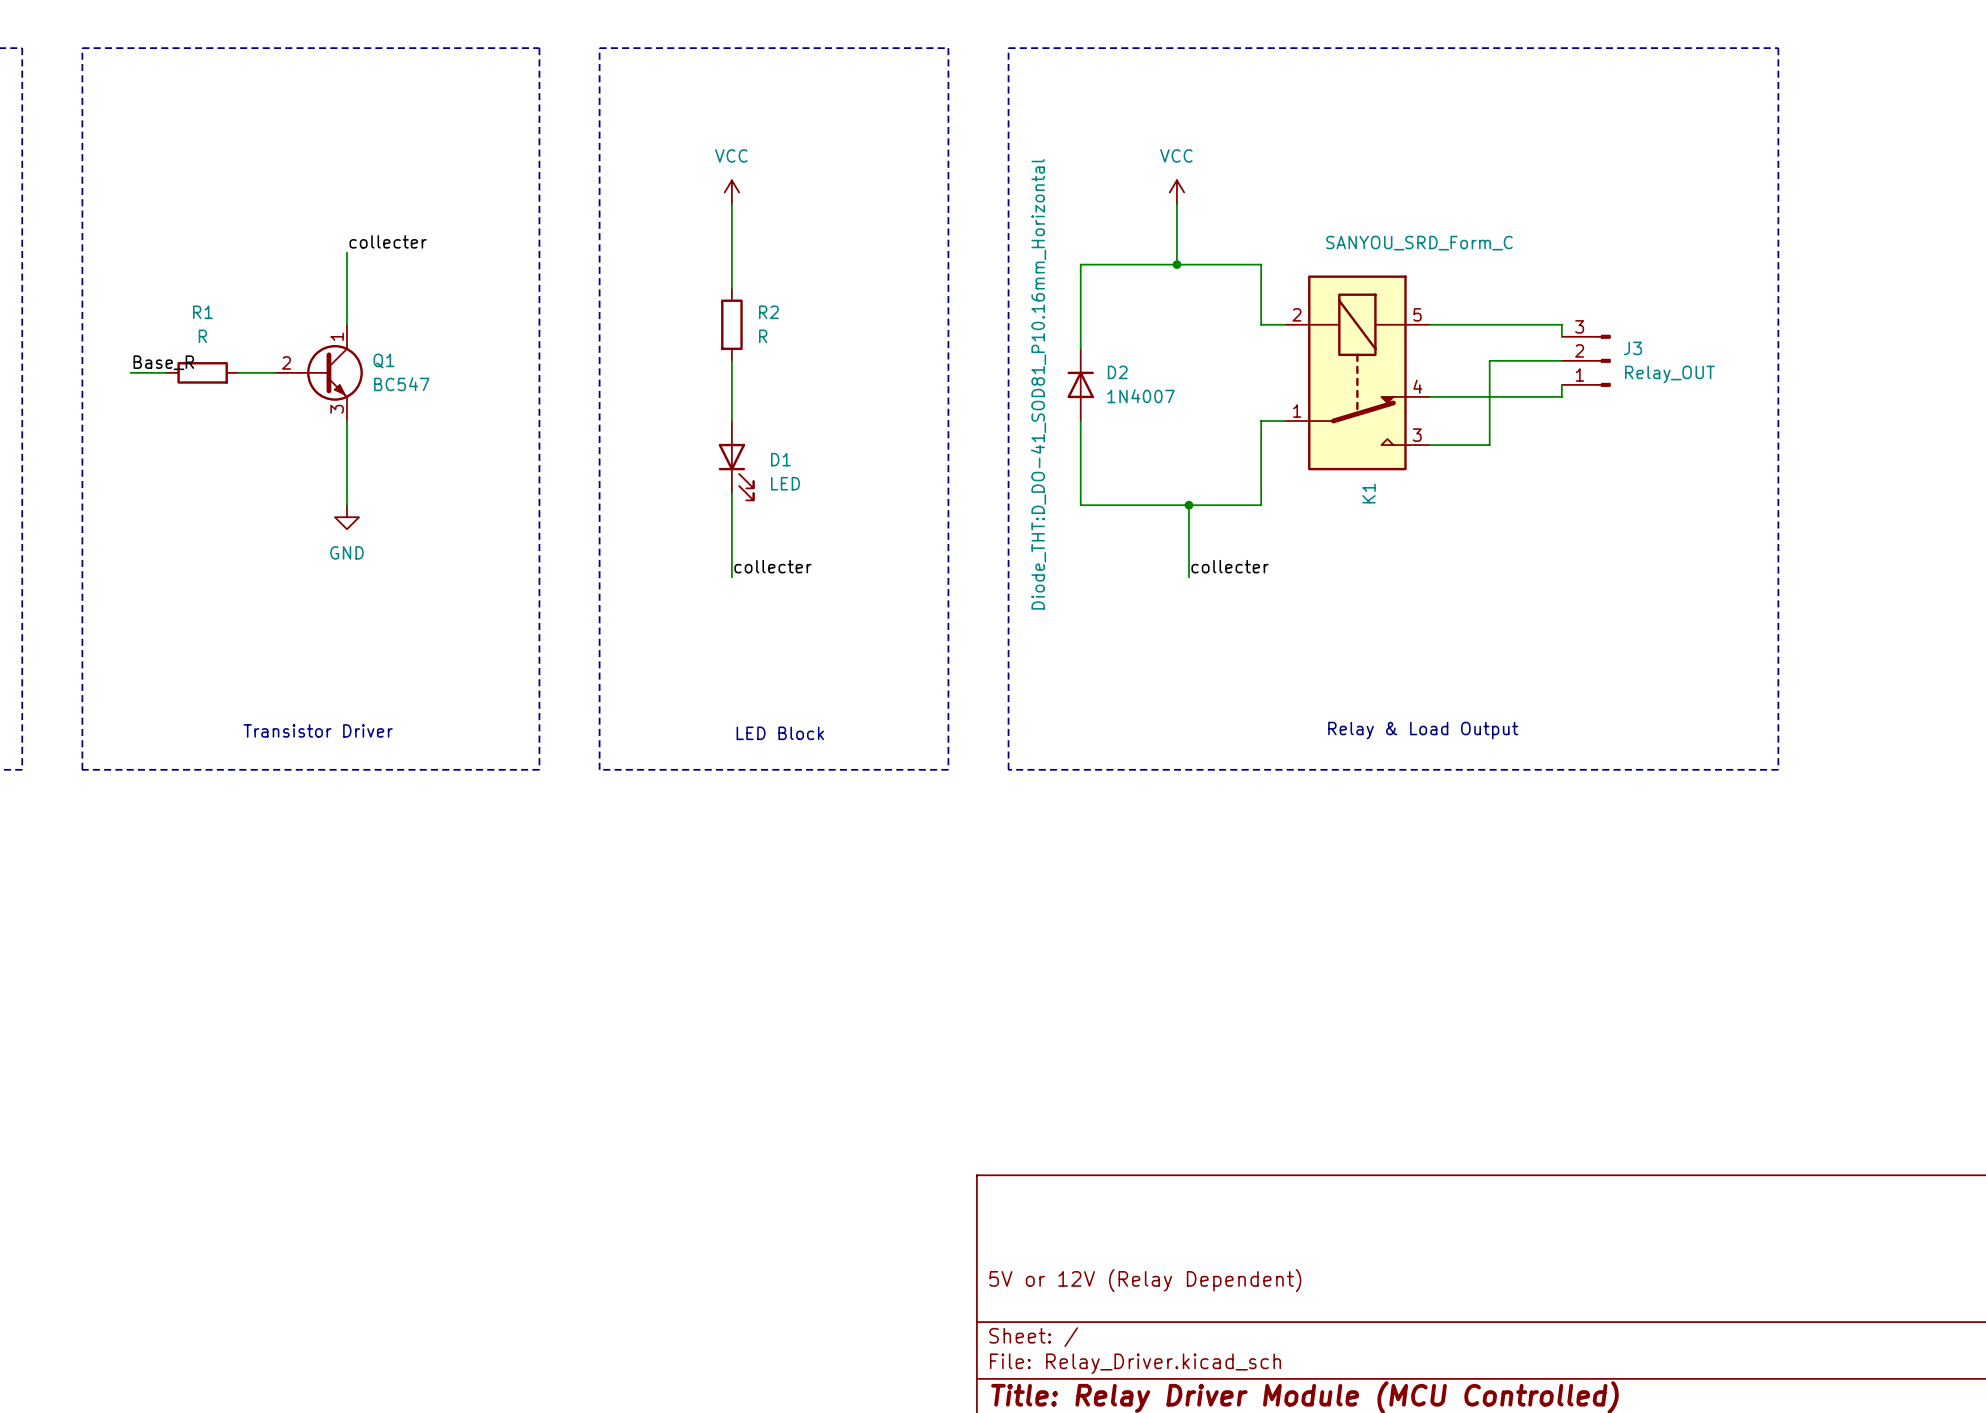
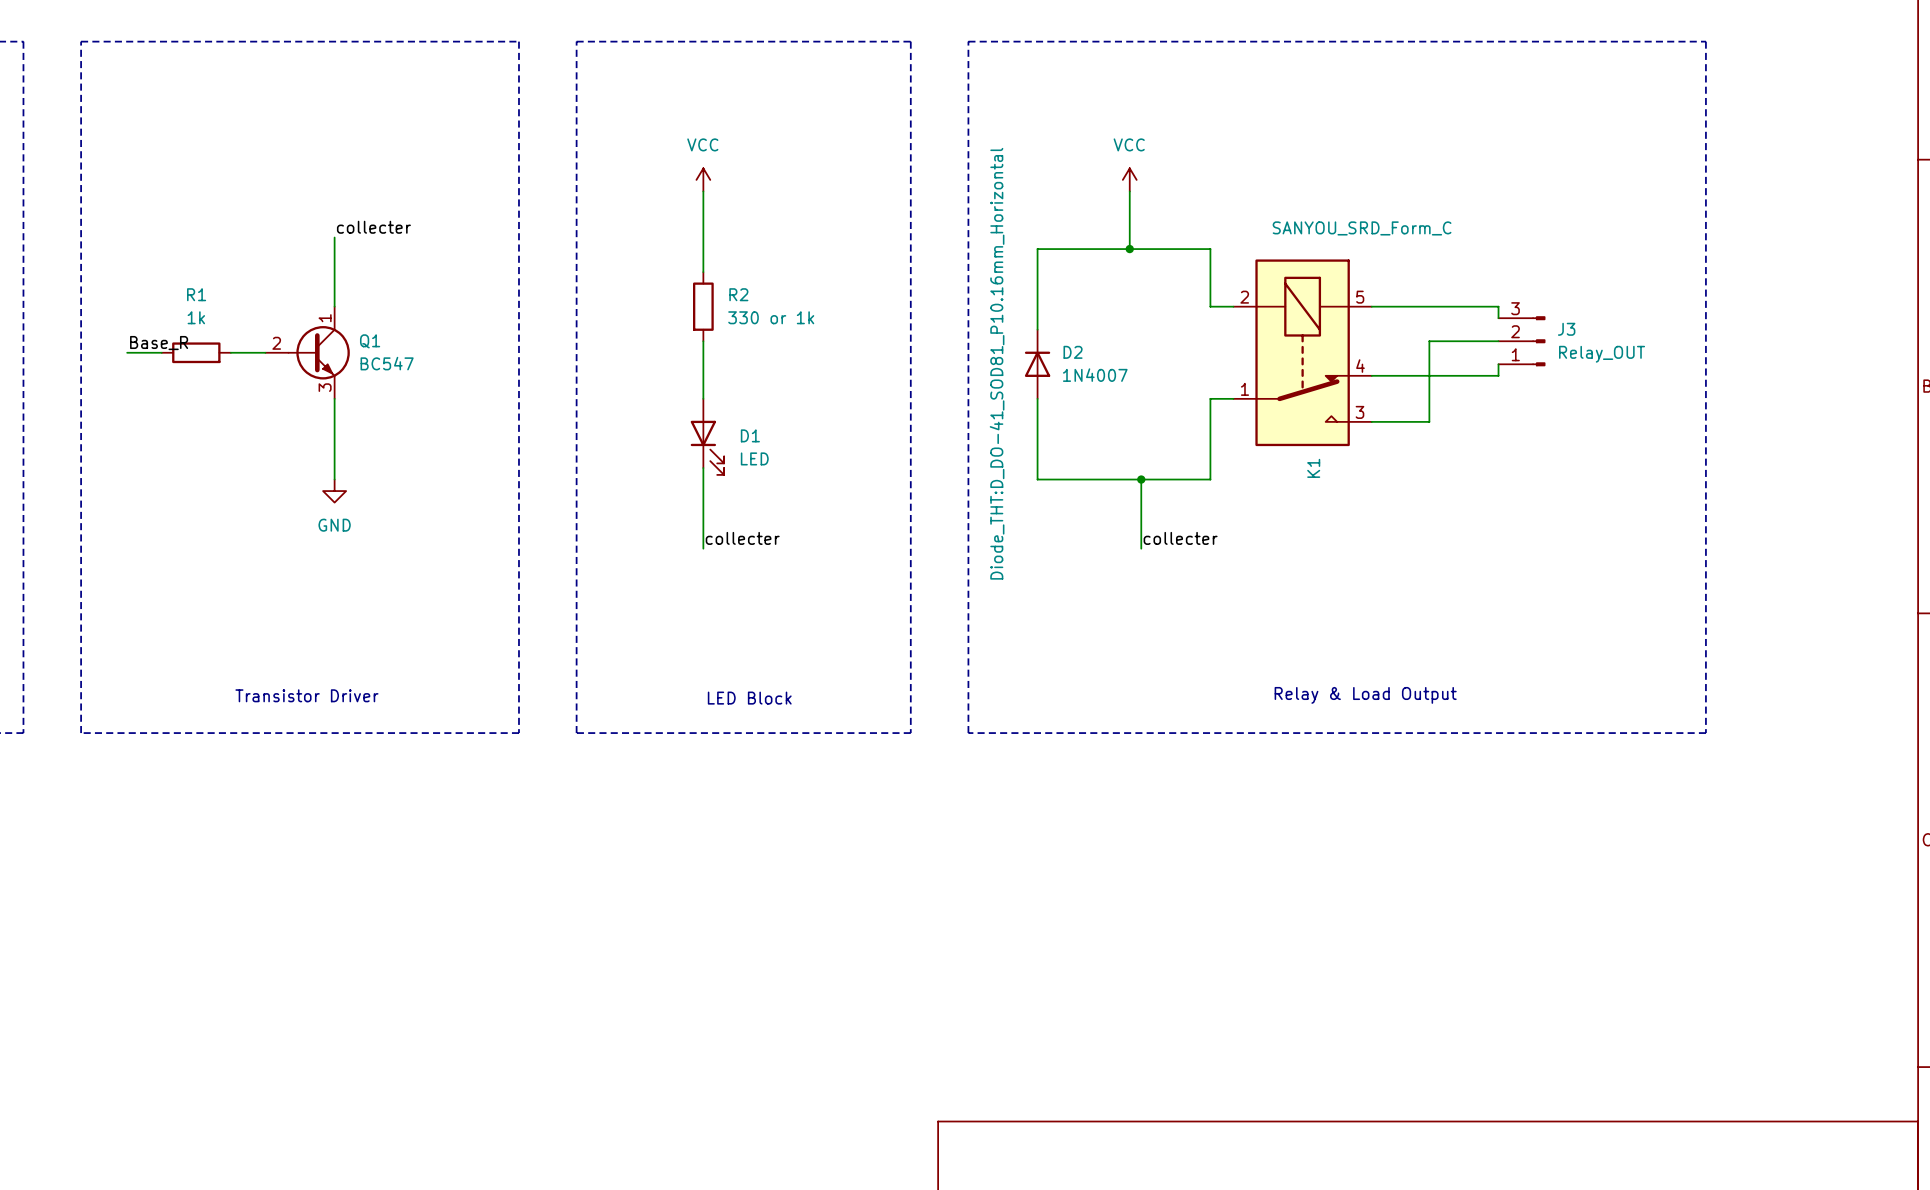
R1 value: R (202, 336) -> 1k (196, 317)
R2 value: R (763, 336) -> 330 or 1k (771, 317)

